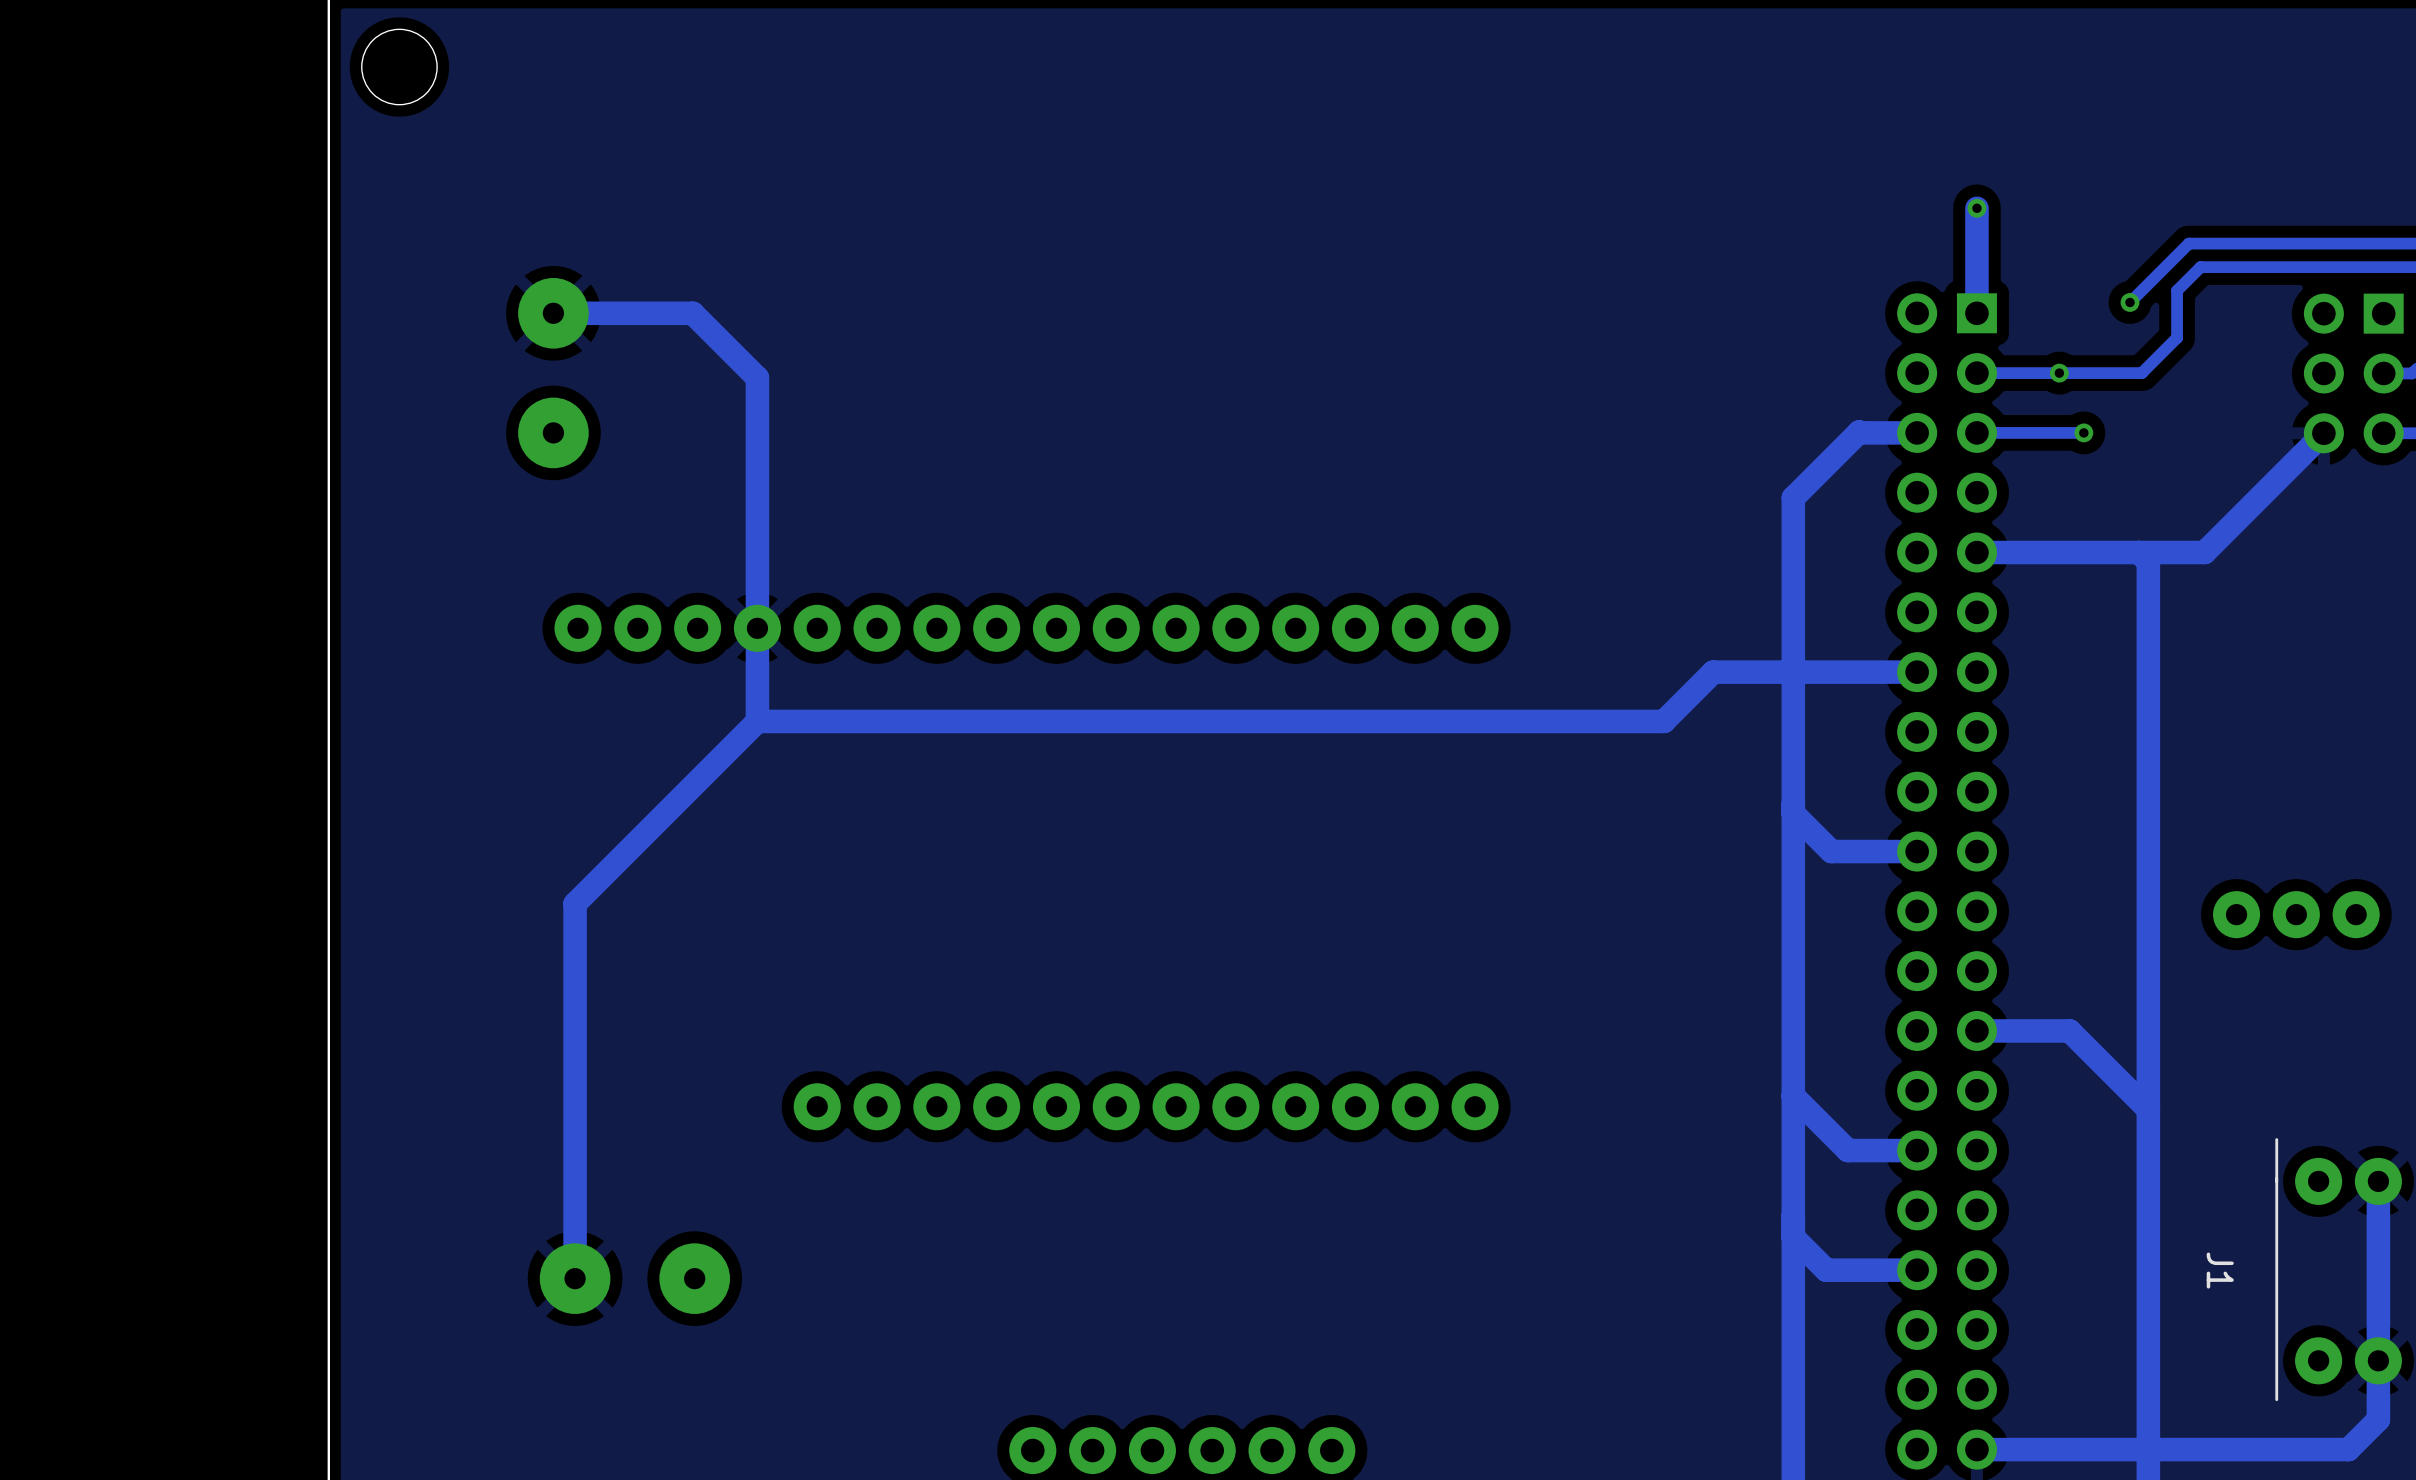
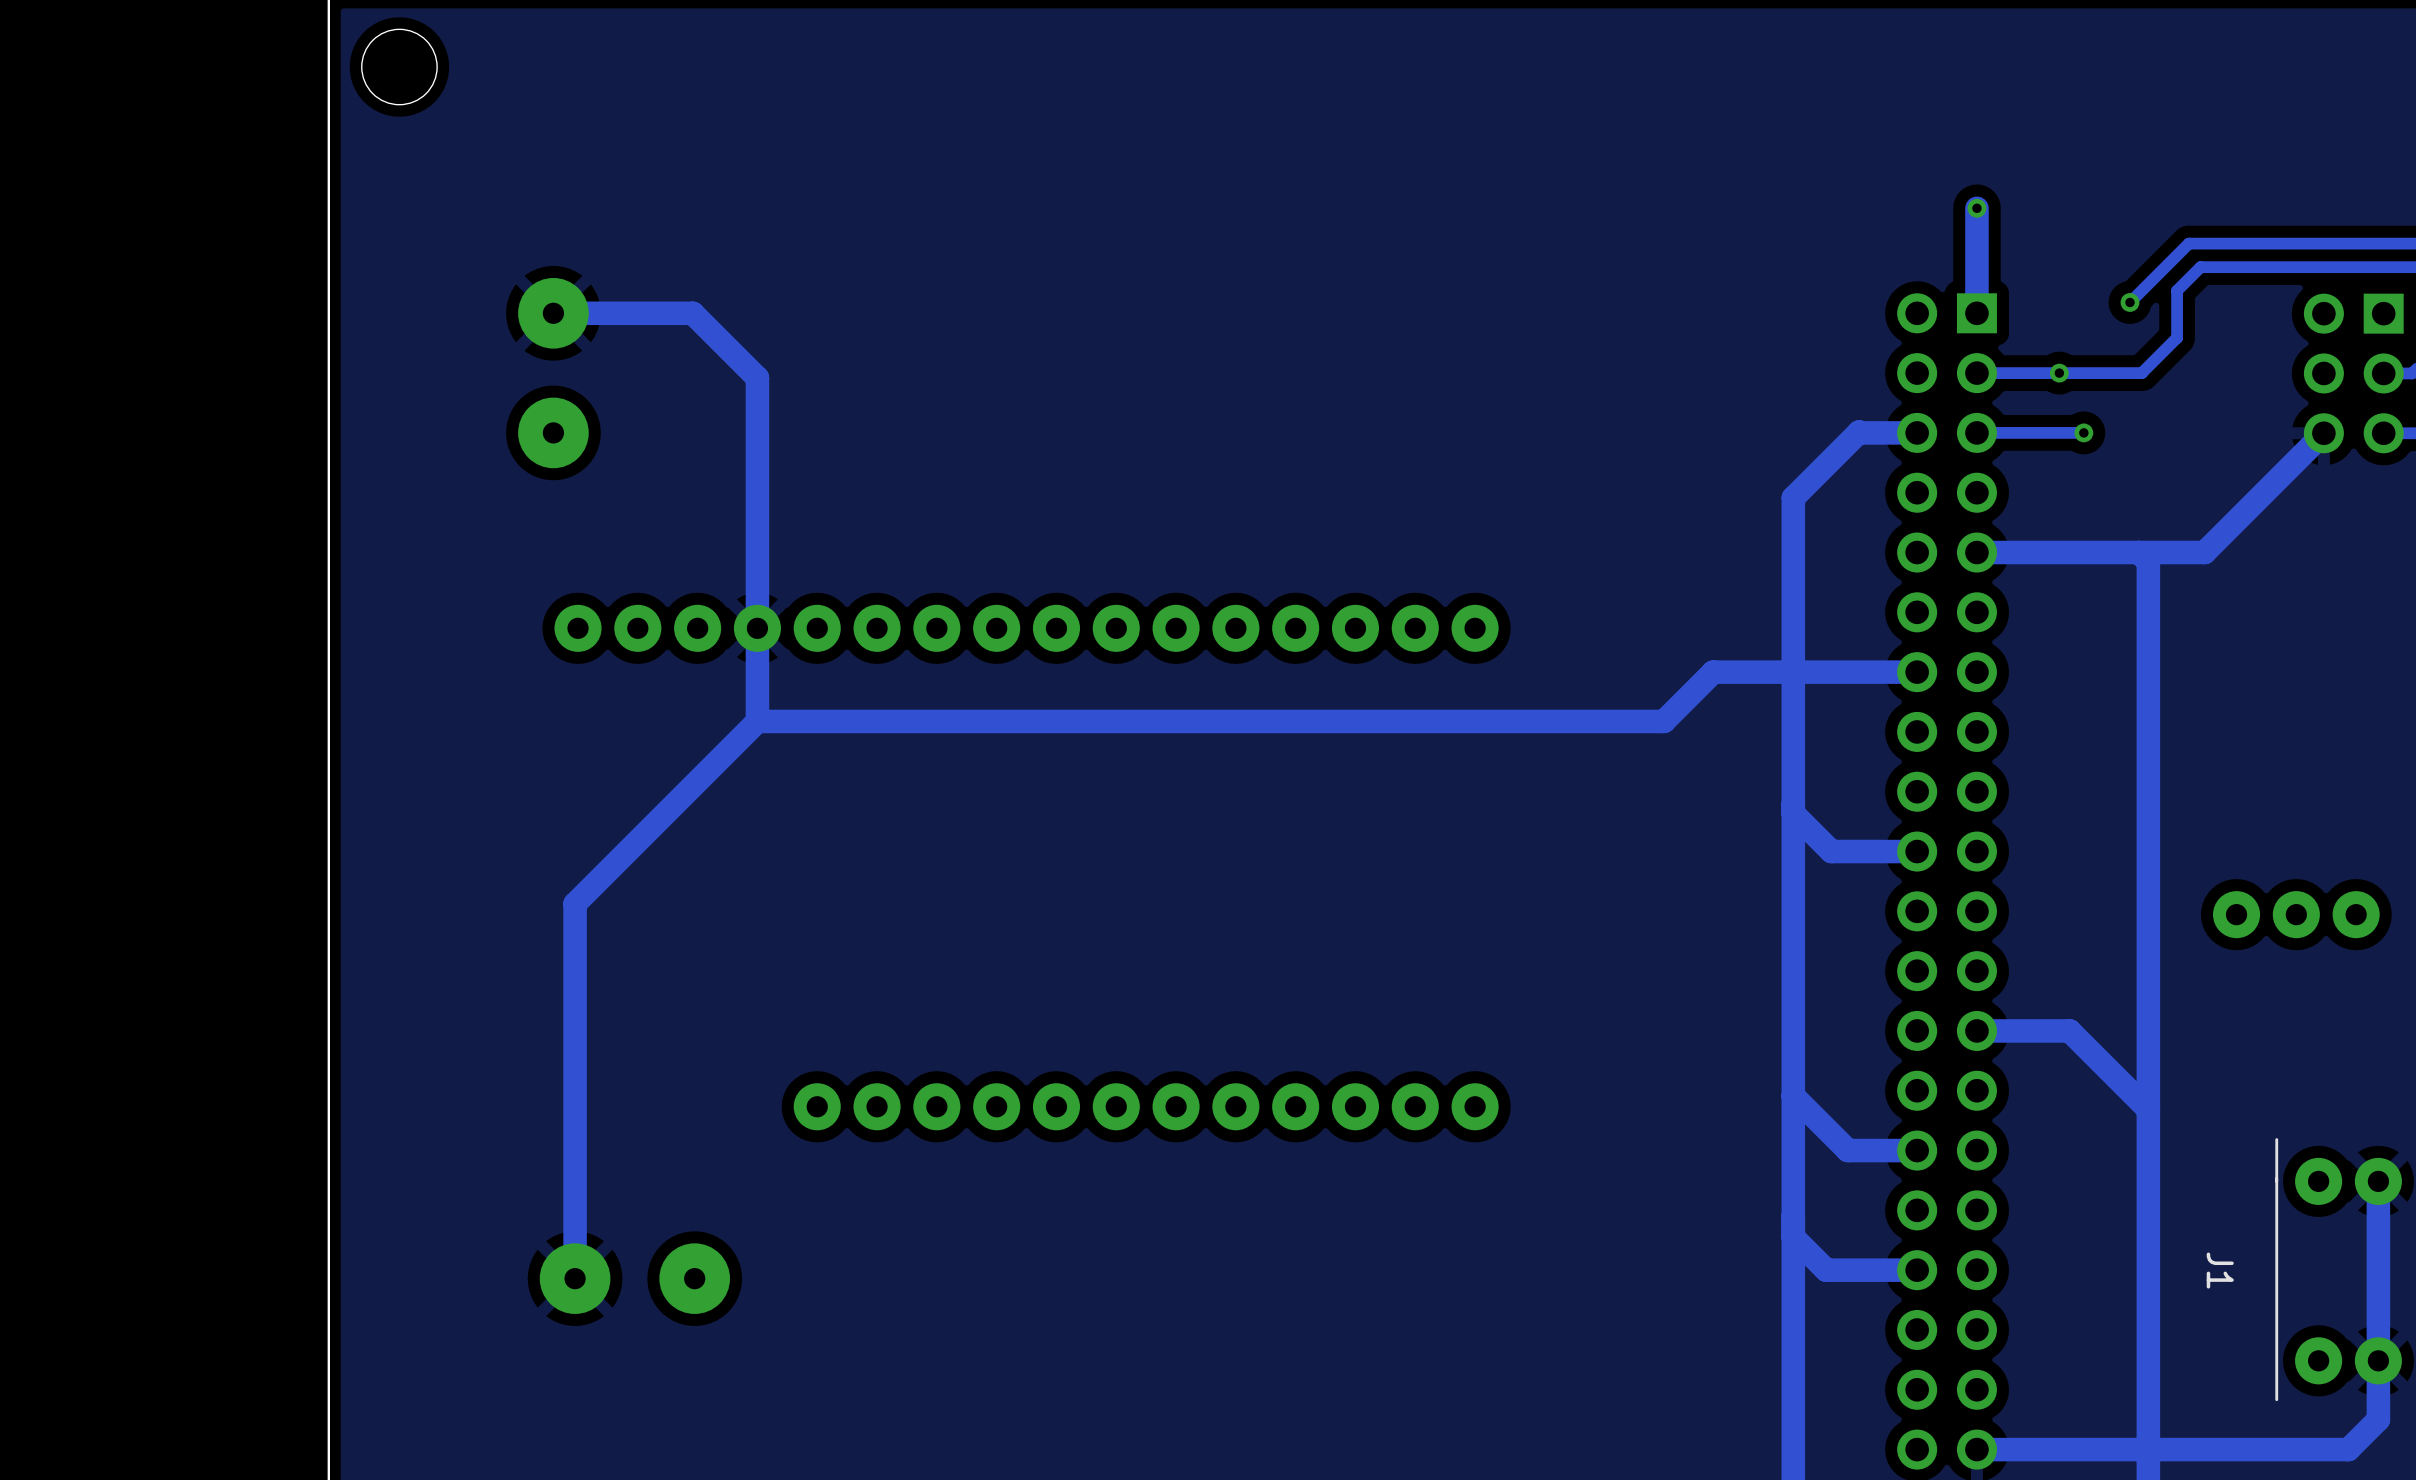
part: (1032, 1450) -> none
part: (1092, 1450) -> none
part: (1152, 1450) -> none
part: (1212, 1450) -> none
part: (1272, 1450) -> none
part: (1331, 1450) -> none

